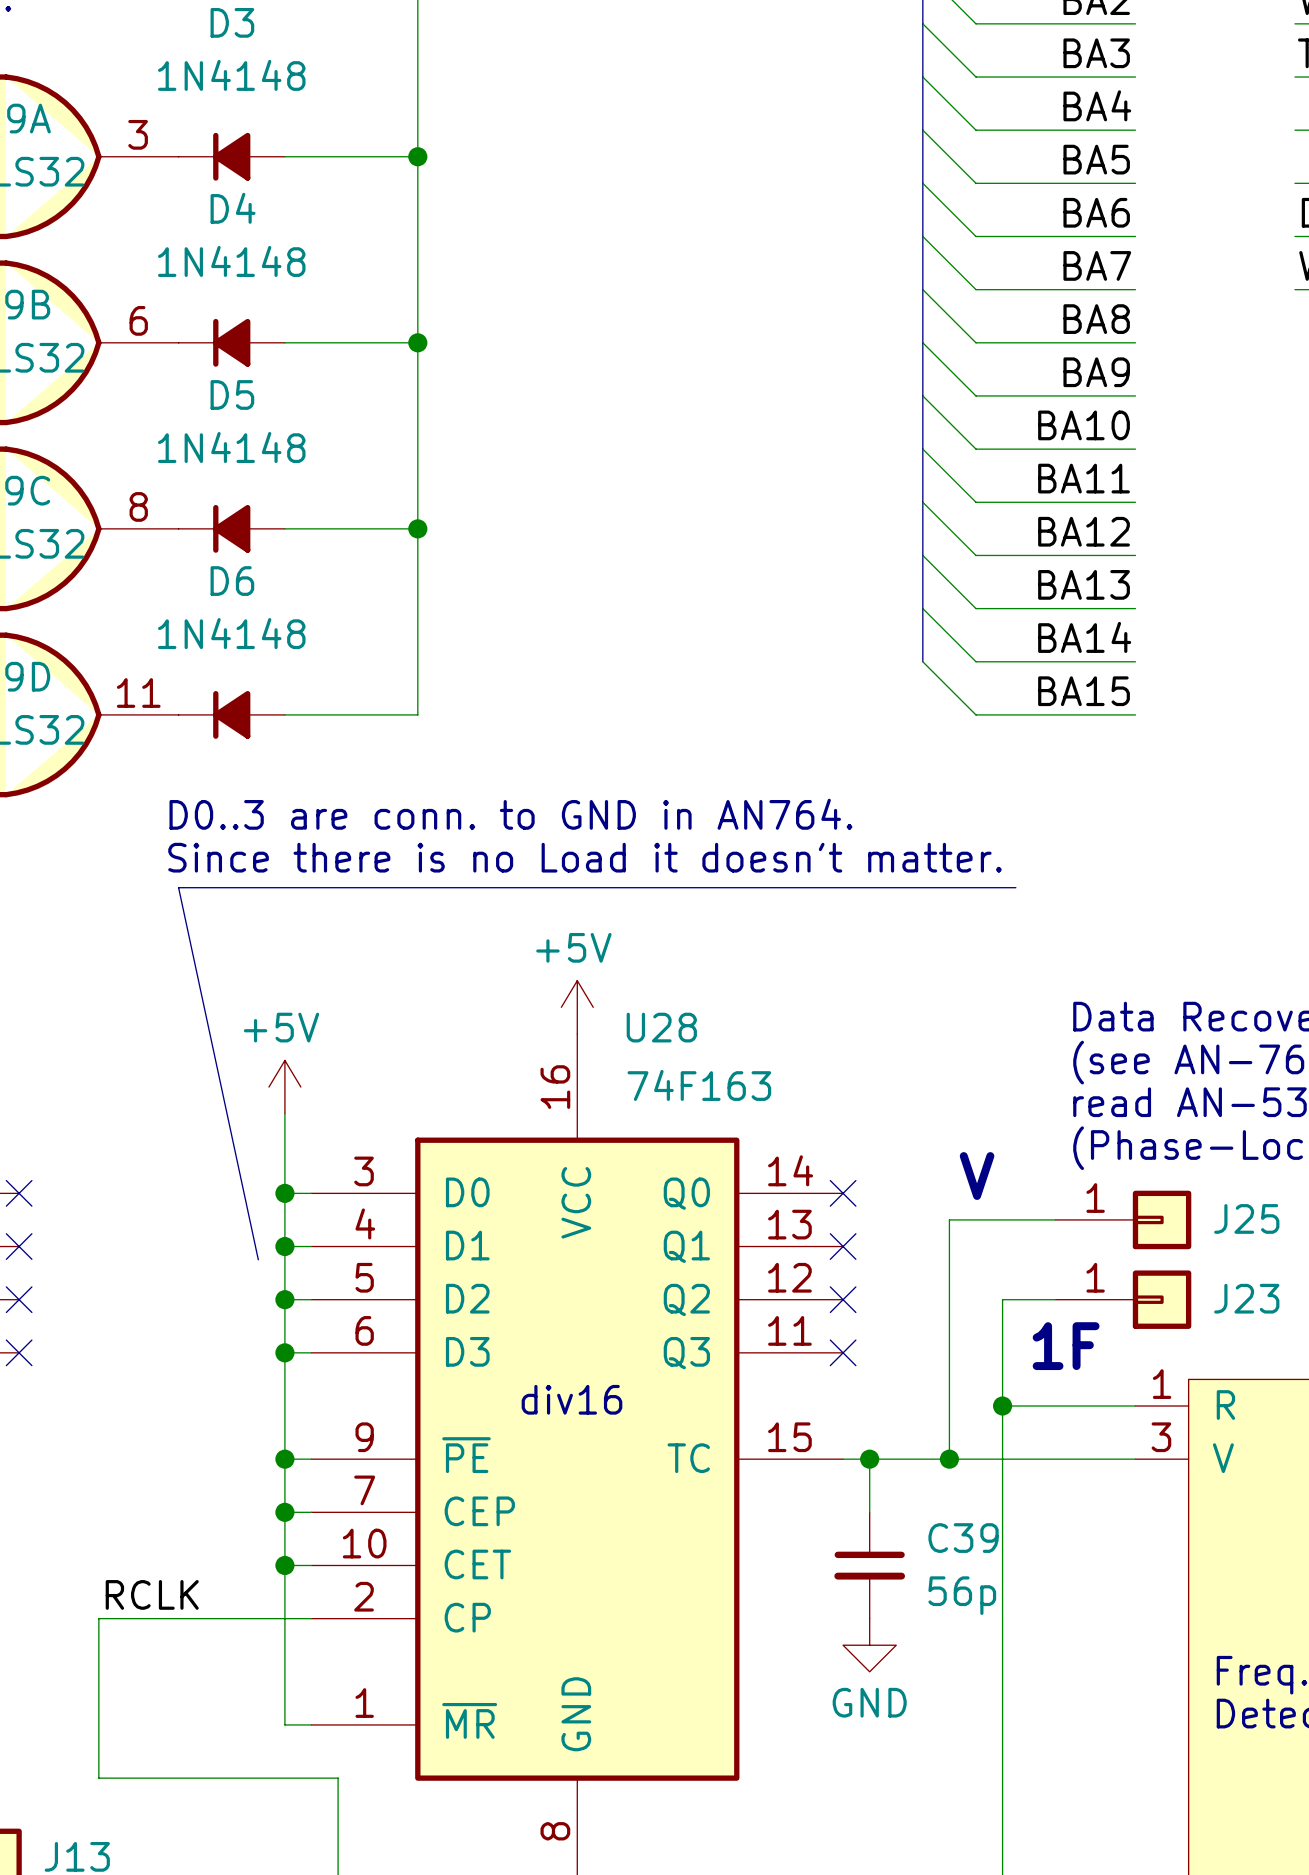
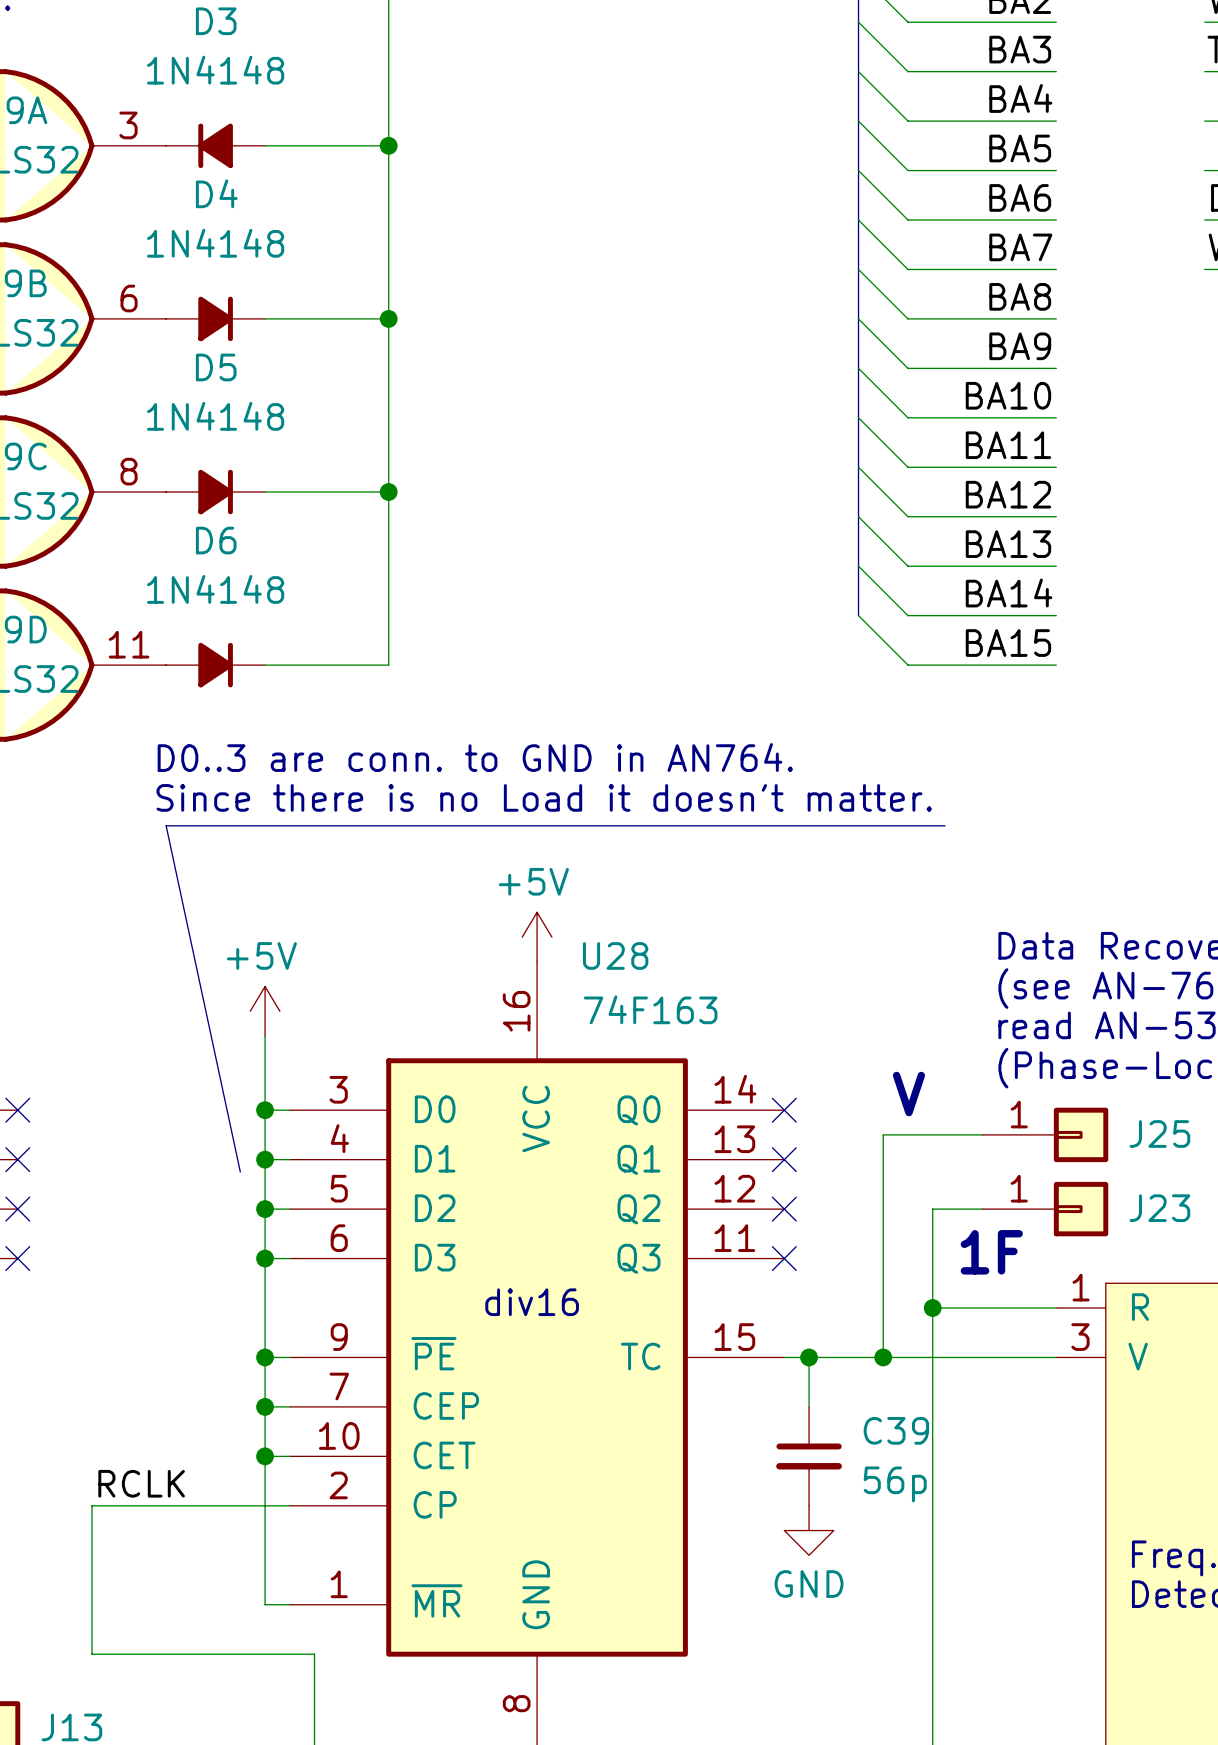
D4 rotation: 0° (231, 342) -> 180° (215, 318)
D5 rotation: 0° (231, 528) -> 180° (215, 492)
D6 rotation: 0° (231, 714) -> 180° (215, 665)

